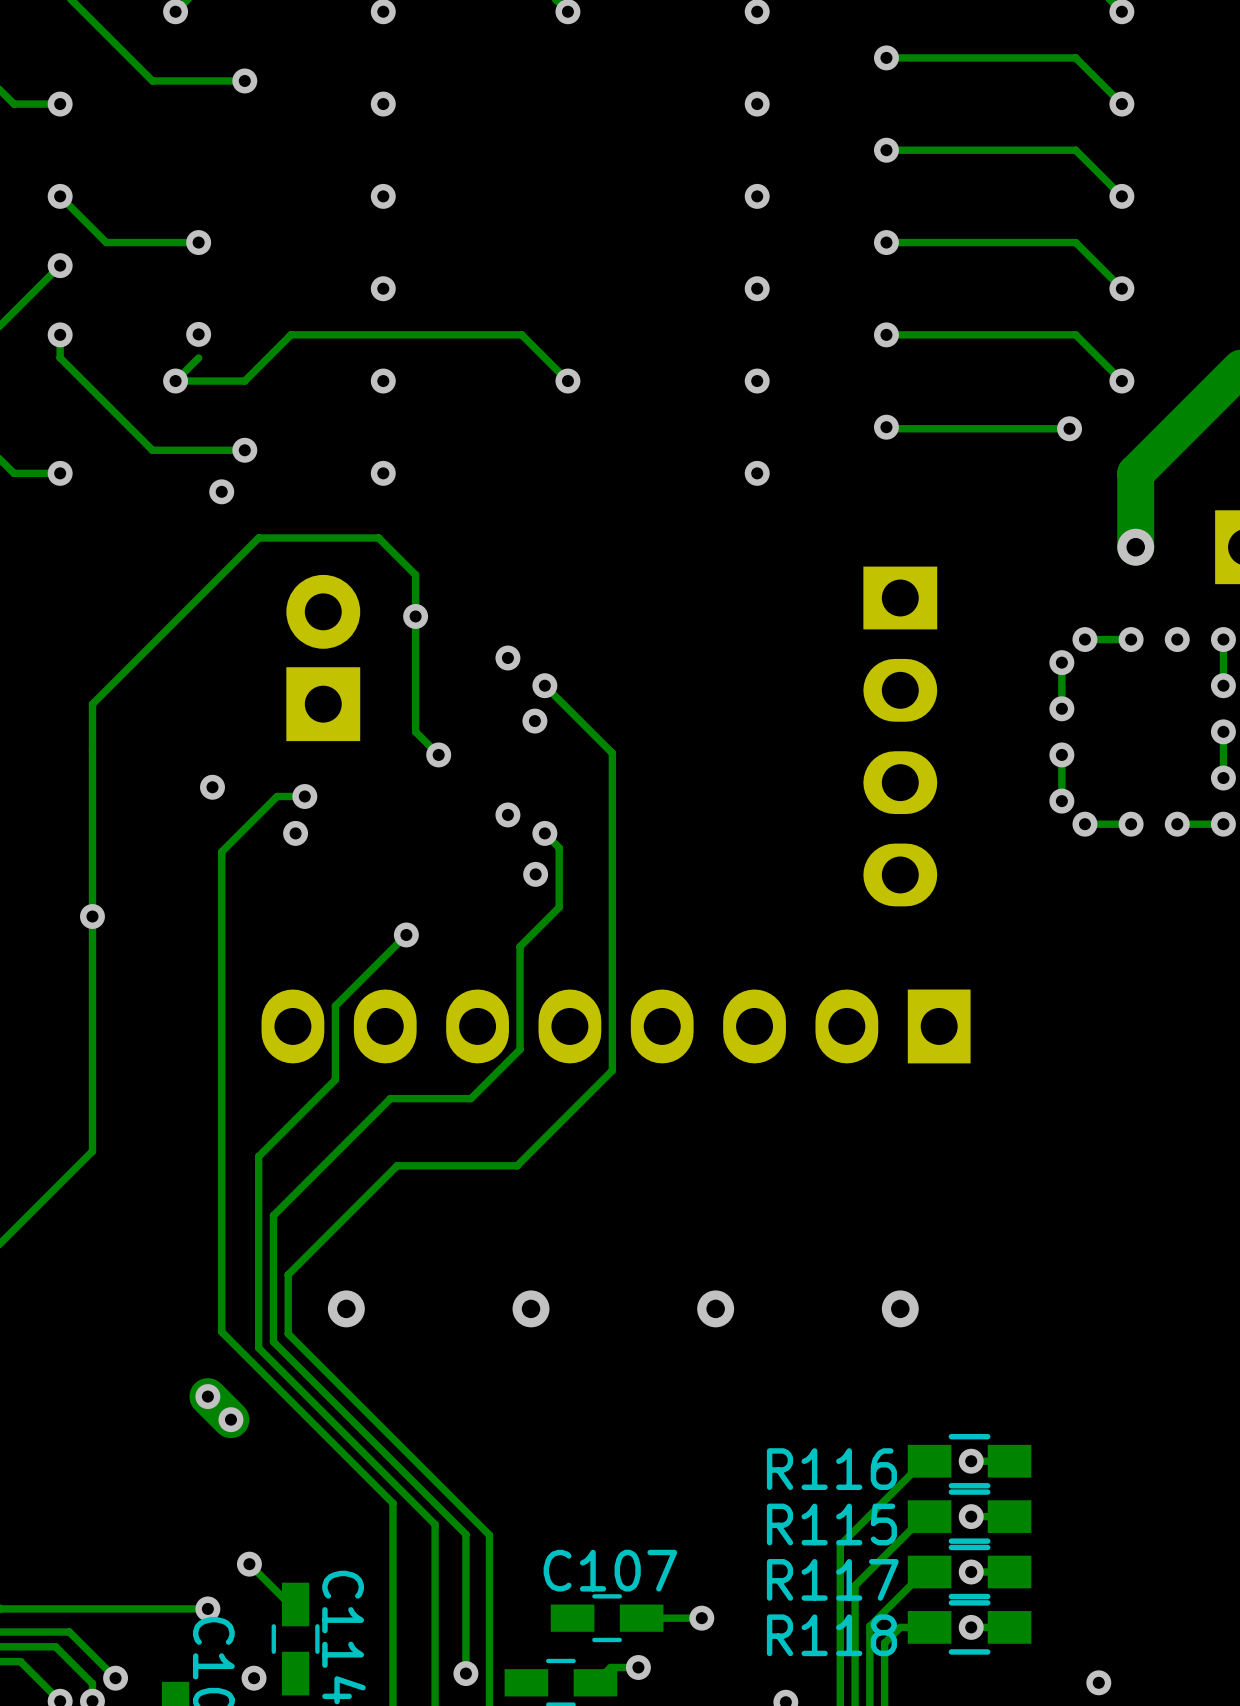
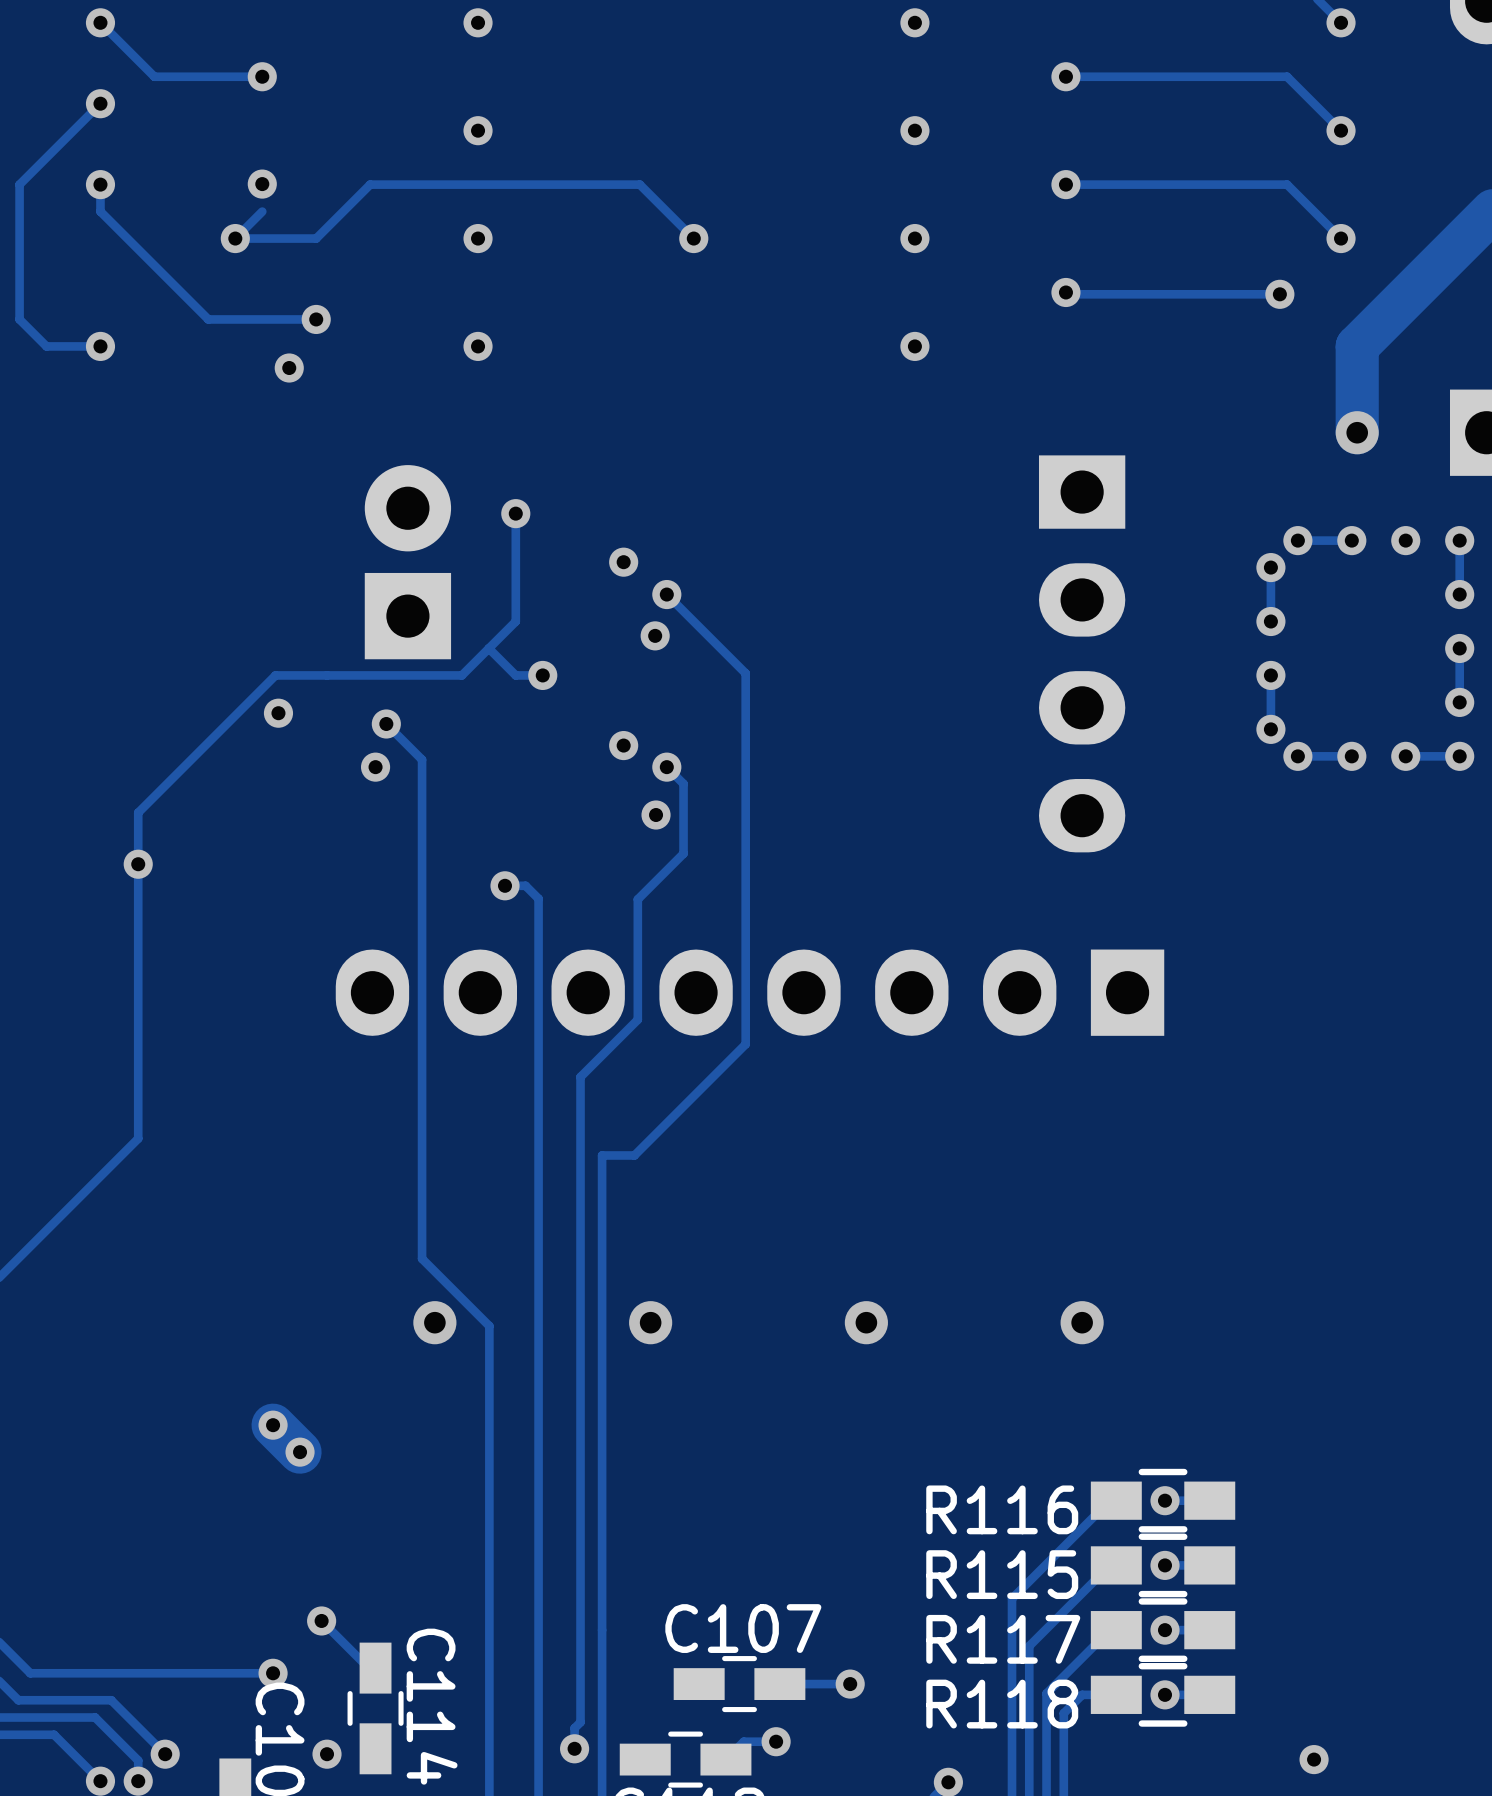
track: (410, 616) (415, 616) (415, 574) (378, 537) (258, 537) (92, 704) (92, 872) -> (515, 621) (461, 675) (275, 675) (138, 812)
track: (415, 708) (415, 731) (438, 754) -> (488, 648) (515, 675) (542, 675)
track: (304, 796) (277, 796) (221, 851) (221, 1331) (392, 1503) -> none
track: (406, 934) (335, 1005) -> (386, 723) (422, 759) (422, 968)
track: none -> (505, 885) (525, 885) (538, 898) (538, 1574)
track: (335, 1079) (258, 1156) (258, 1348) (435, 1524) -> (422, 1055) (422, 1258) (489, 1326) (489, 1549)
track: (471, 1098) (390, 1098) (273, 1215) (273, 1341) (465, 1534) (465, 1655) -> (580, 1077) (580, 1722) (574, 1728)
track: (489, 1165) (397, 1165) (288, 1274) (288, 1333) (489, 1535) -> (602, 1155) (602, 1586)

